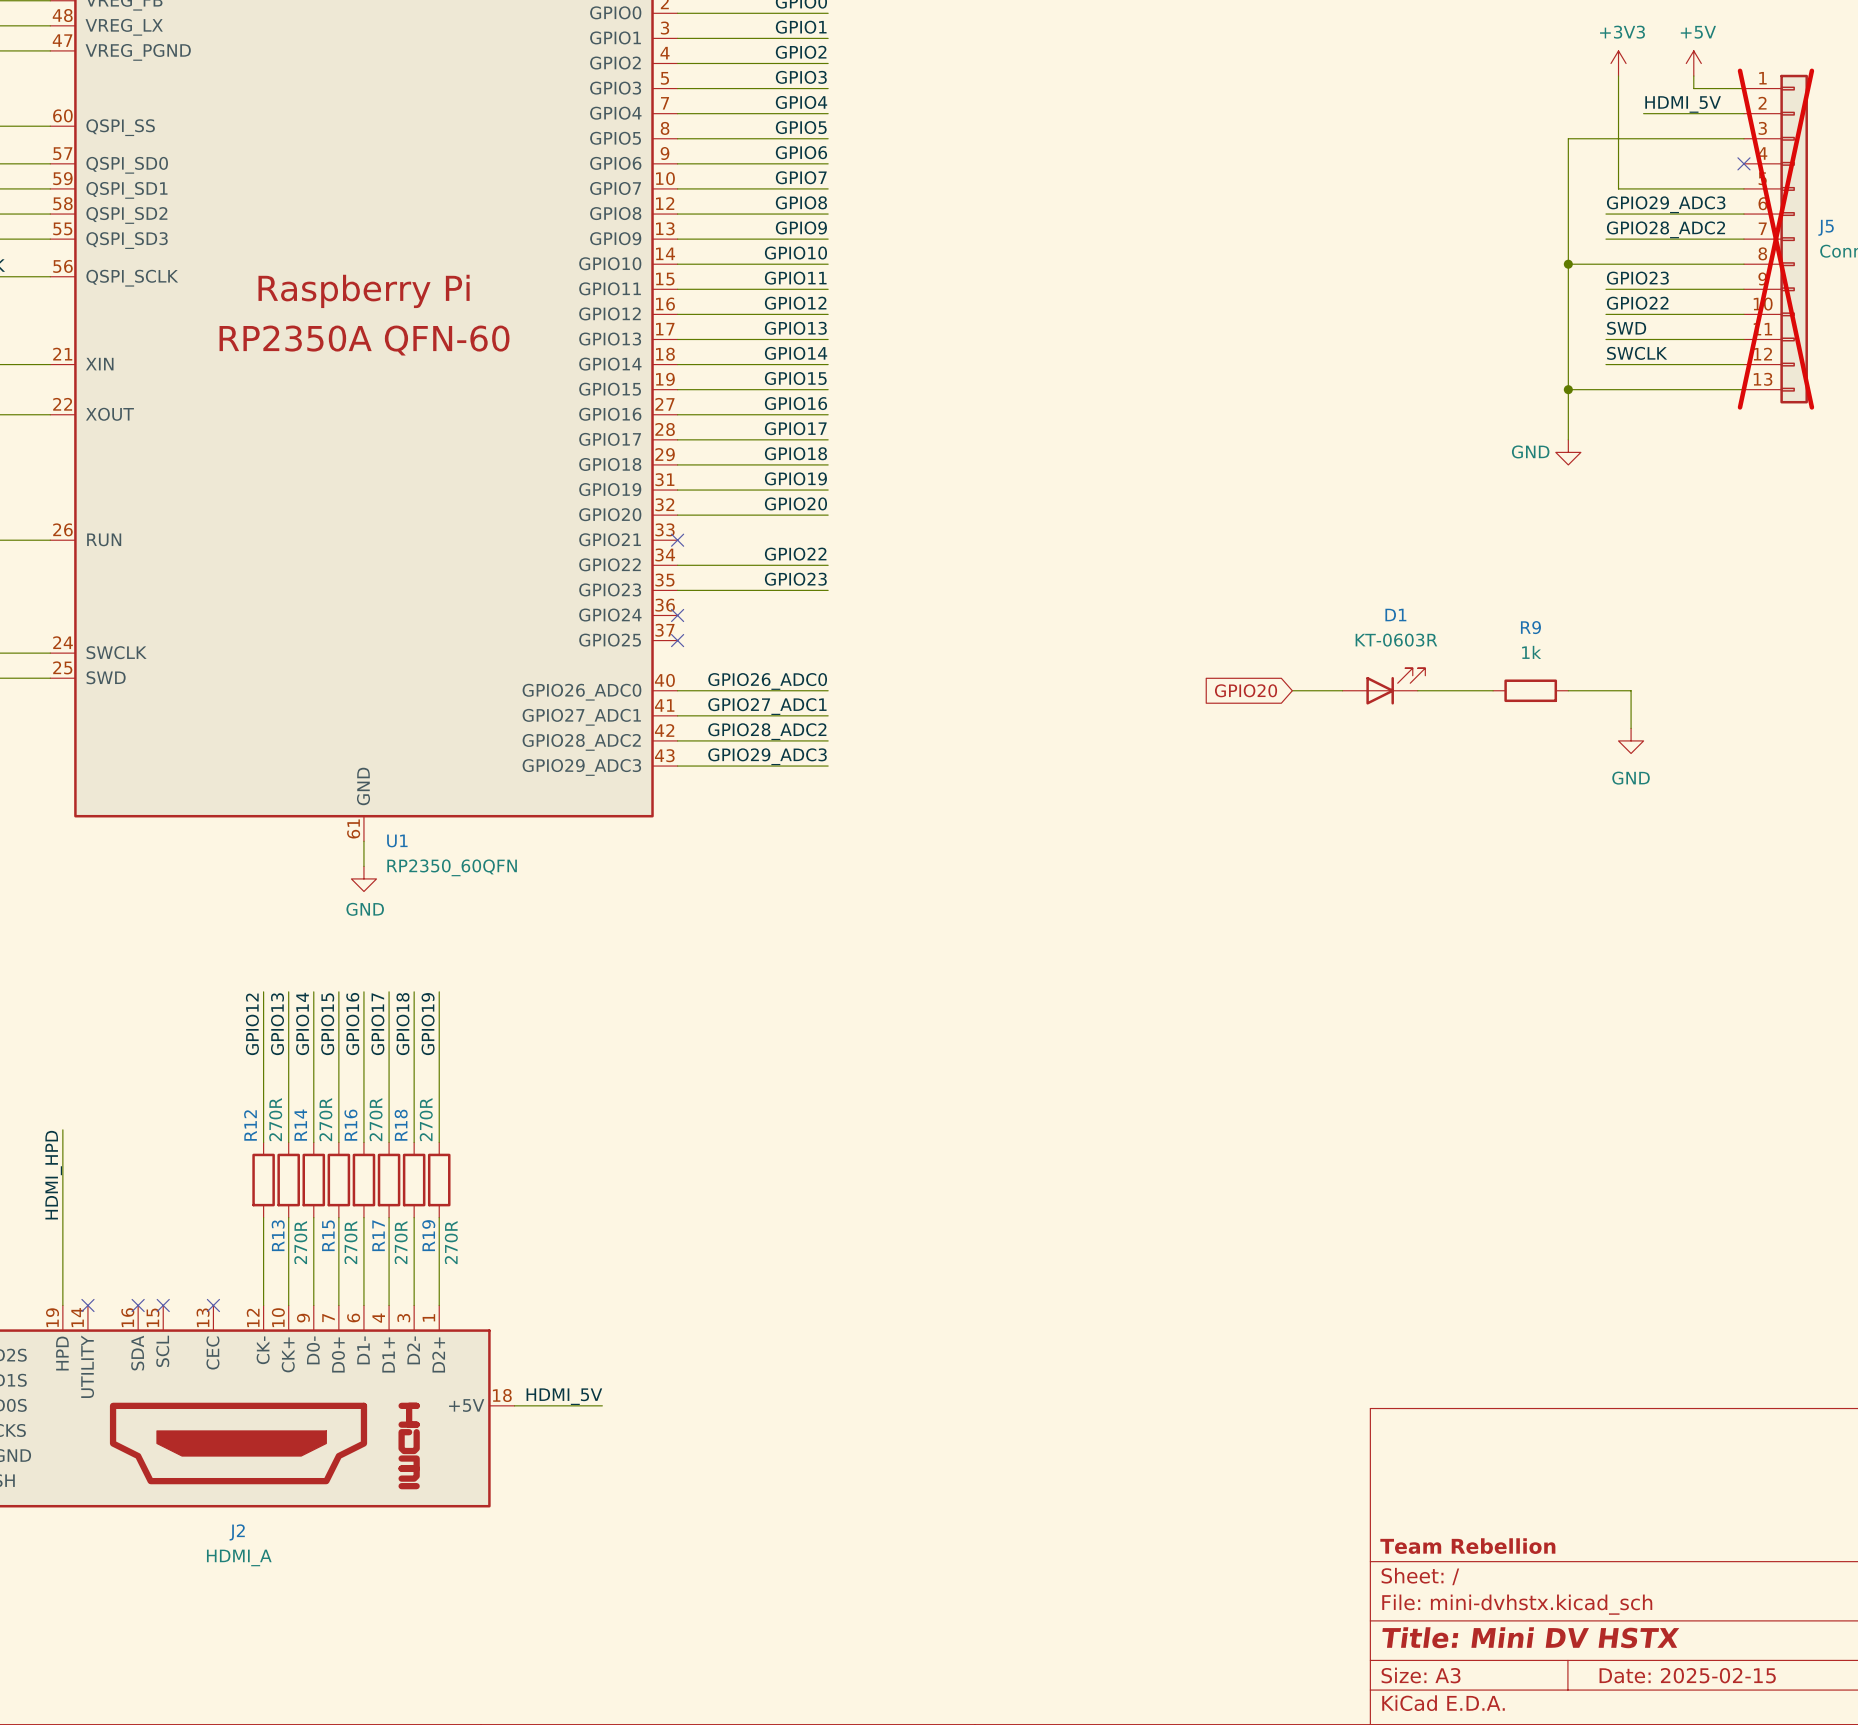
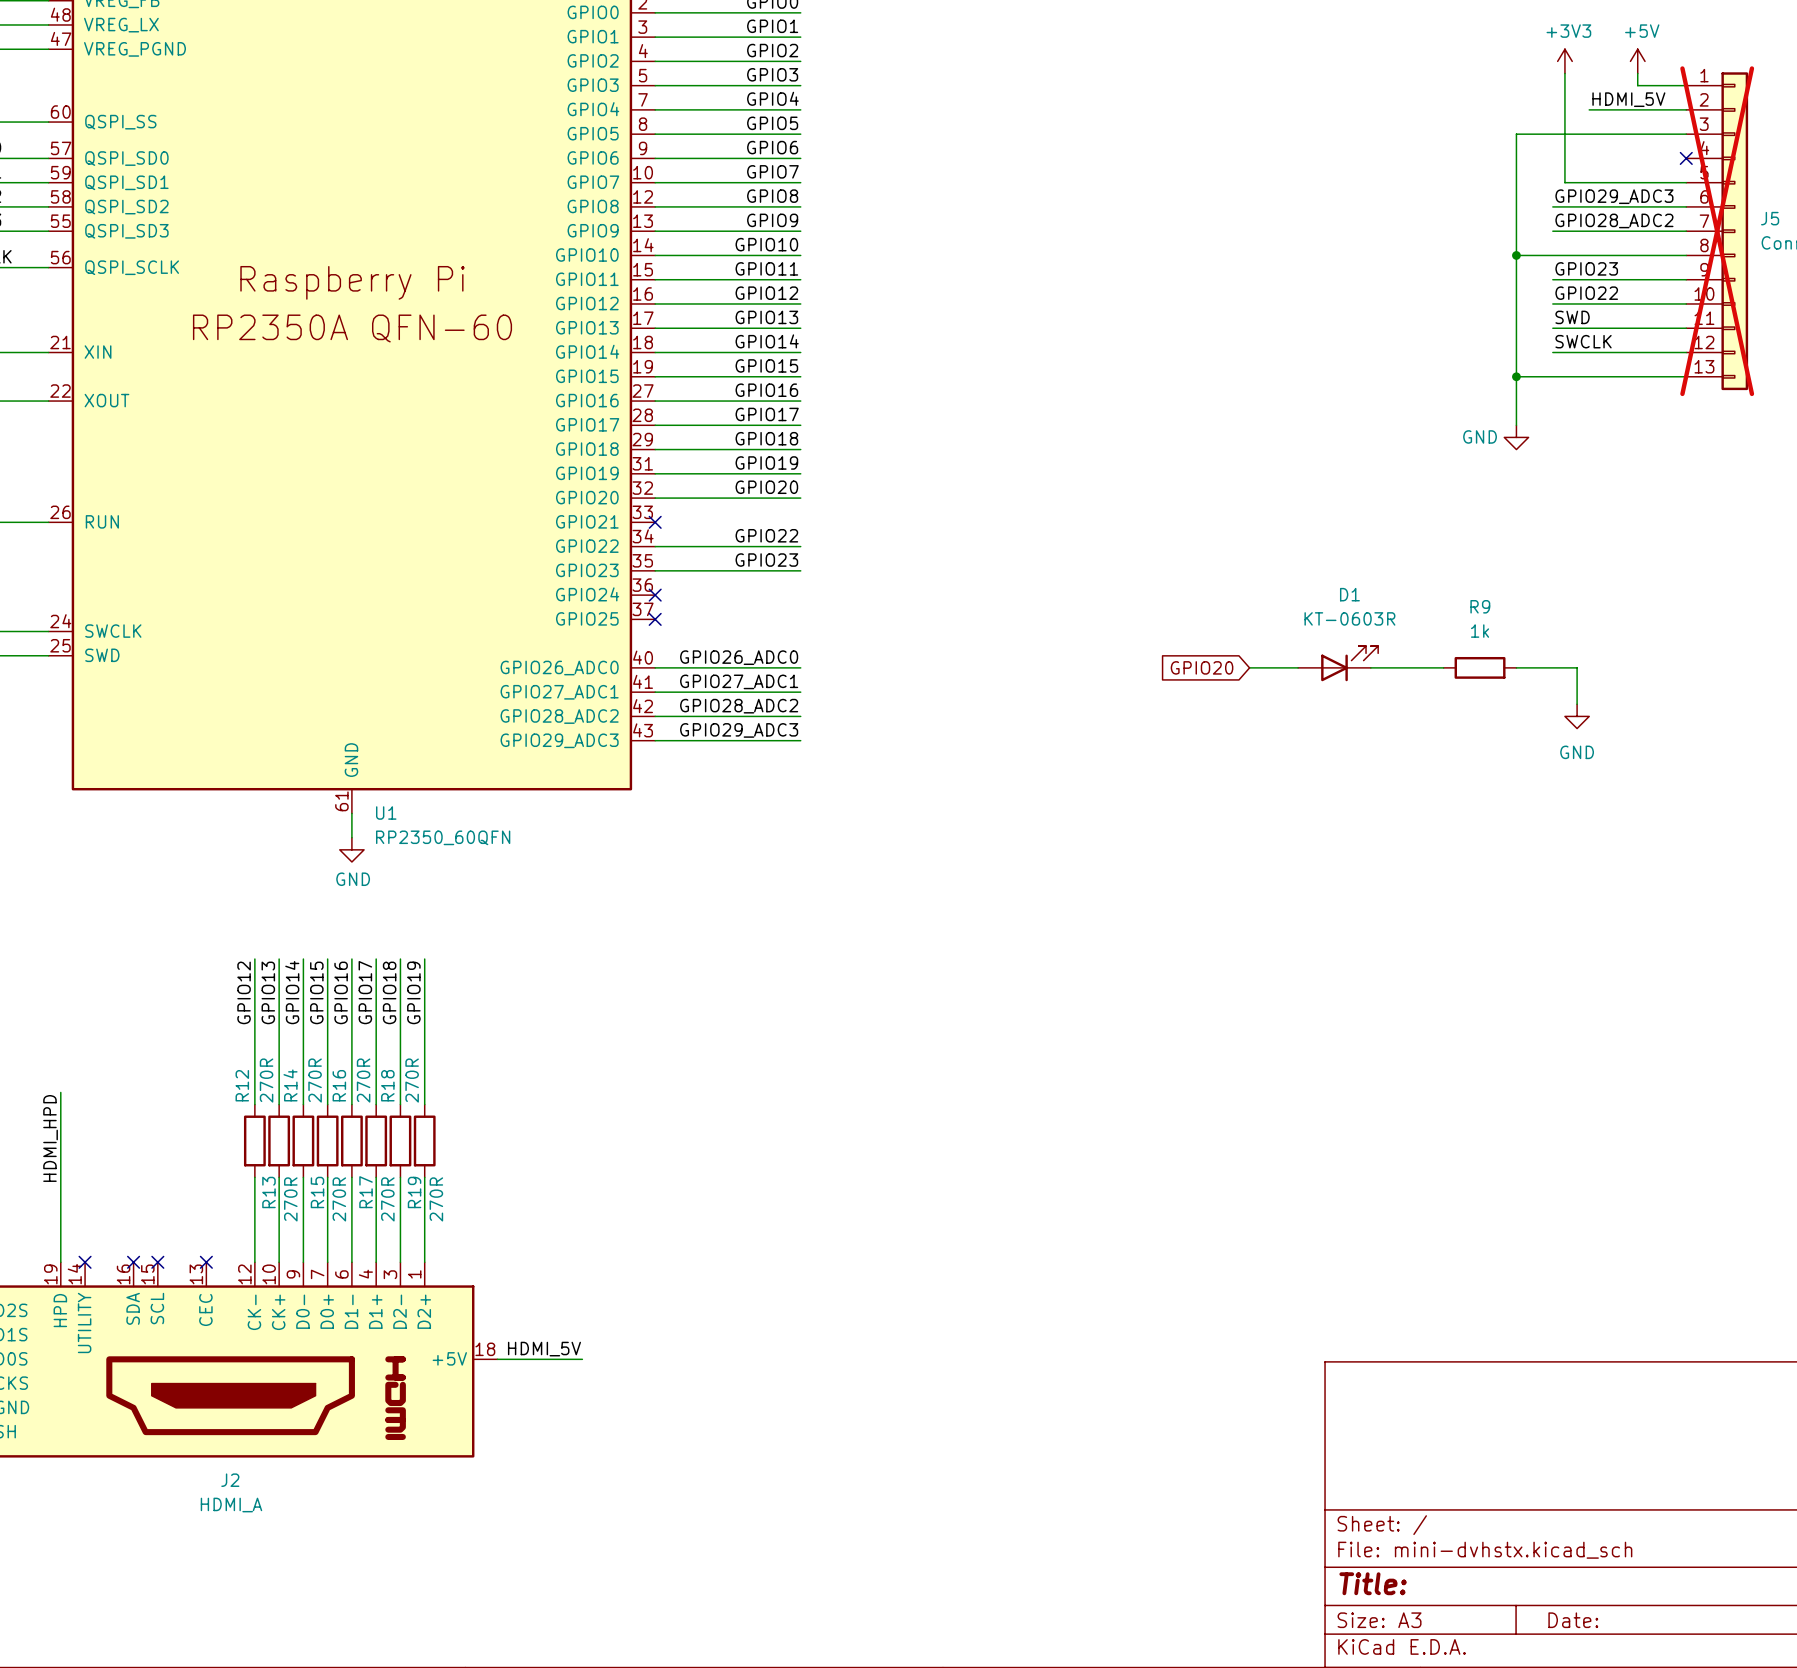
title block: Team Rebellion (1467, 1546) -> none
title block: Title: Mini DV HSTX (1530, 1637) -> Title: (1373, 1583)
title block: Date: 2025-02-15 (1687, 1675) -> Date: (1573, 1620)

